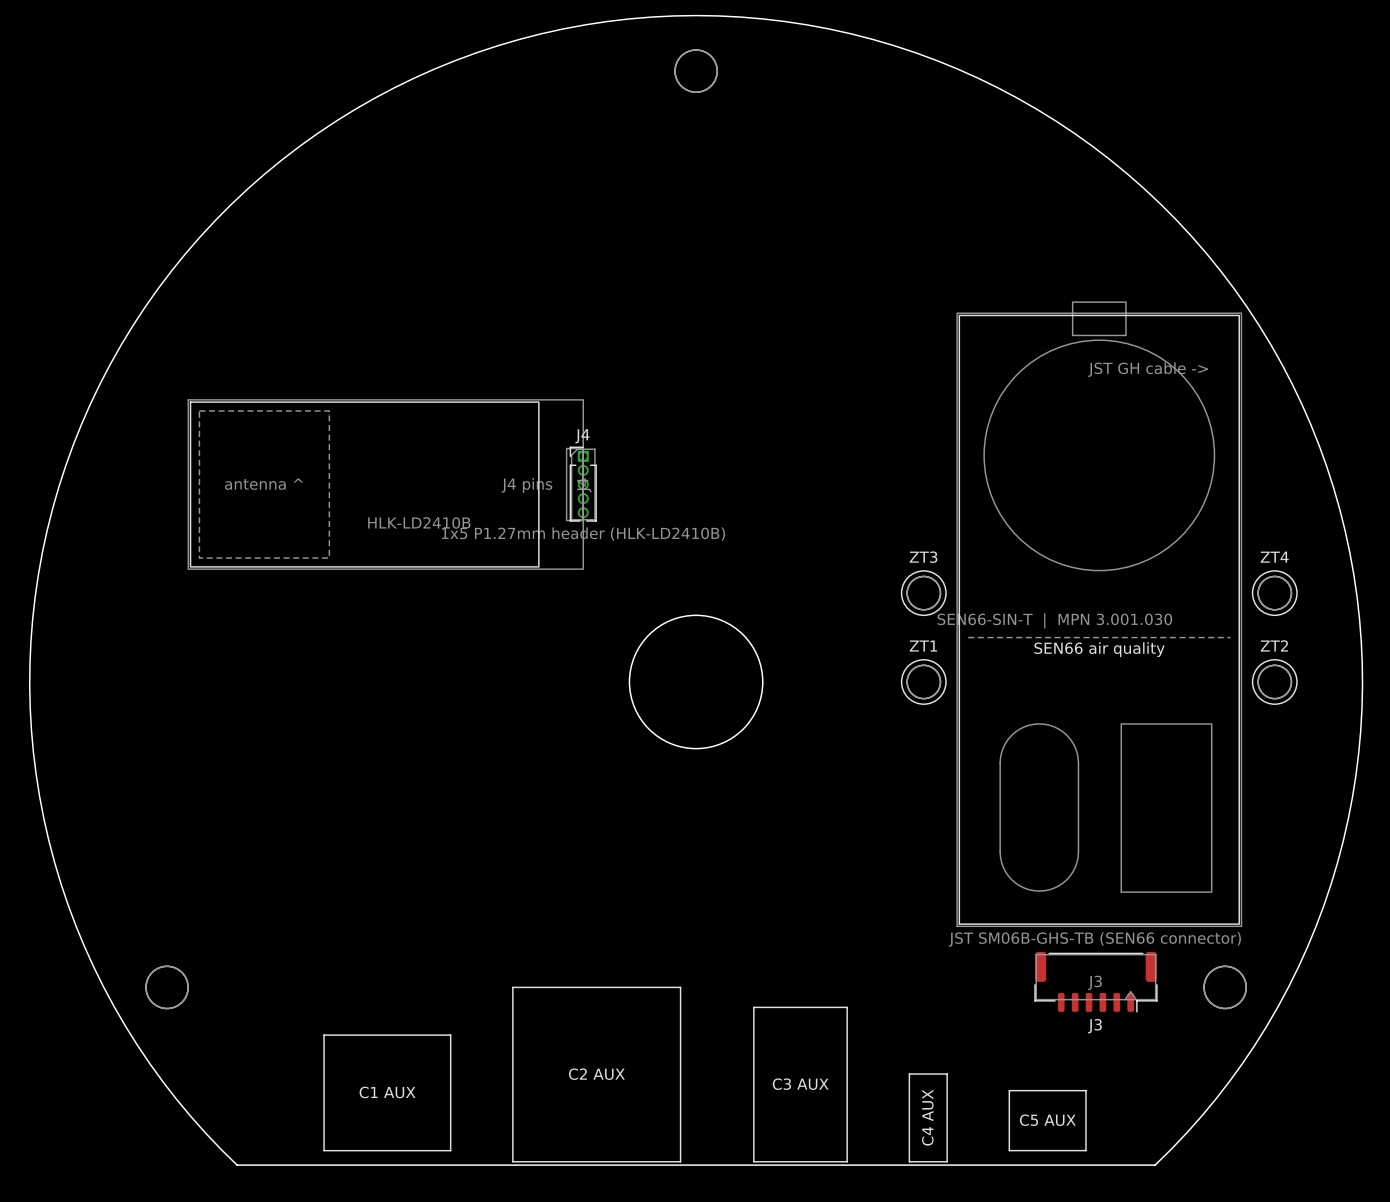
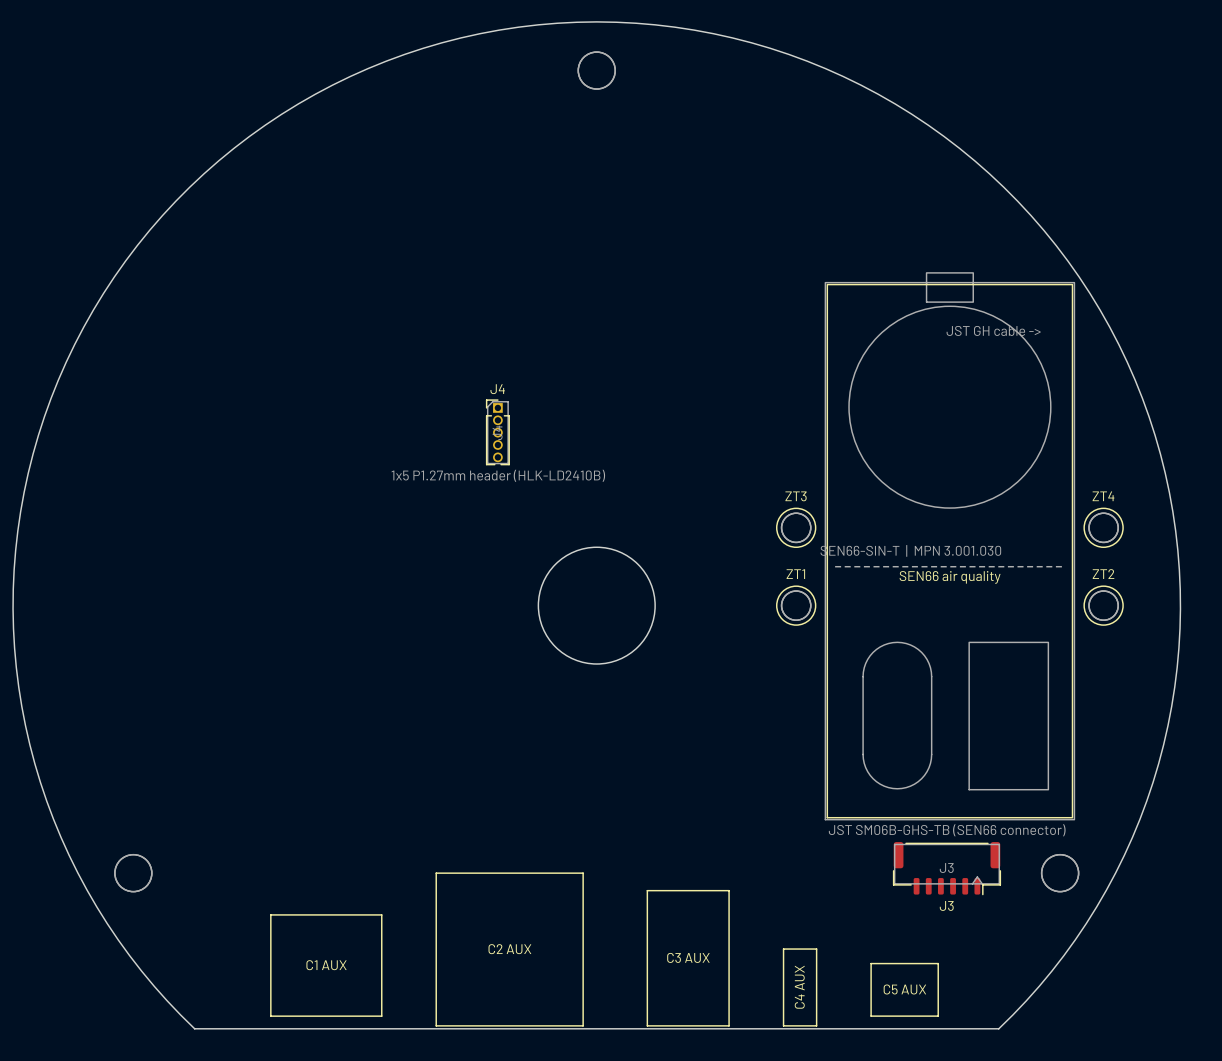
drawing: [187, 399, 584, 570] -> none

